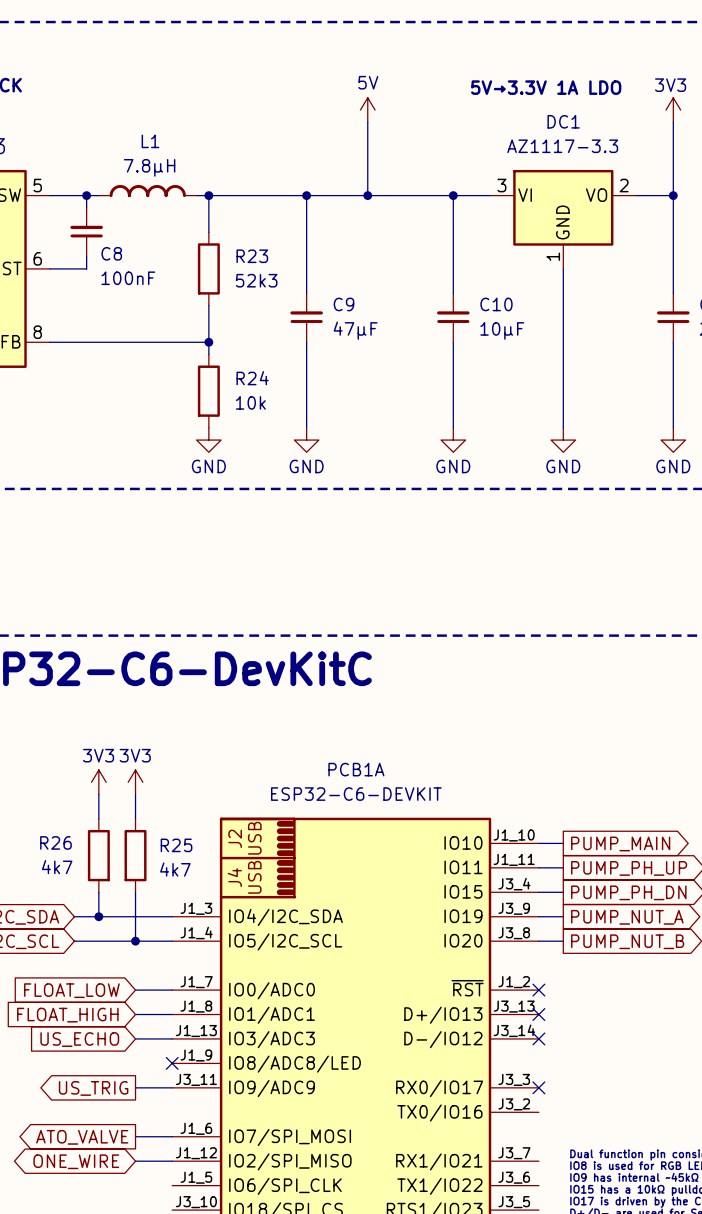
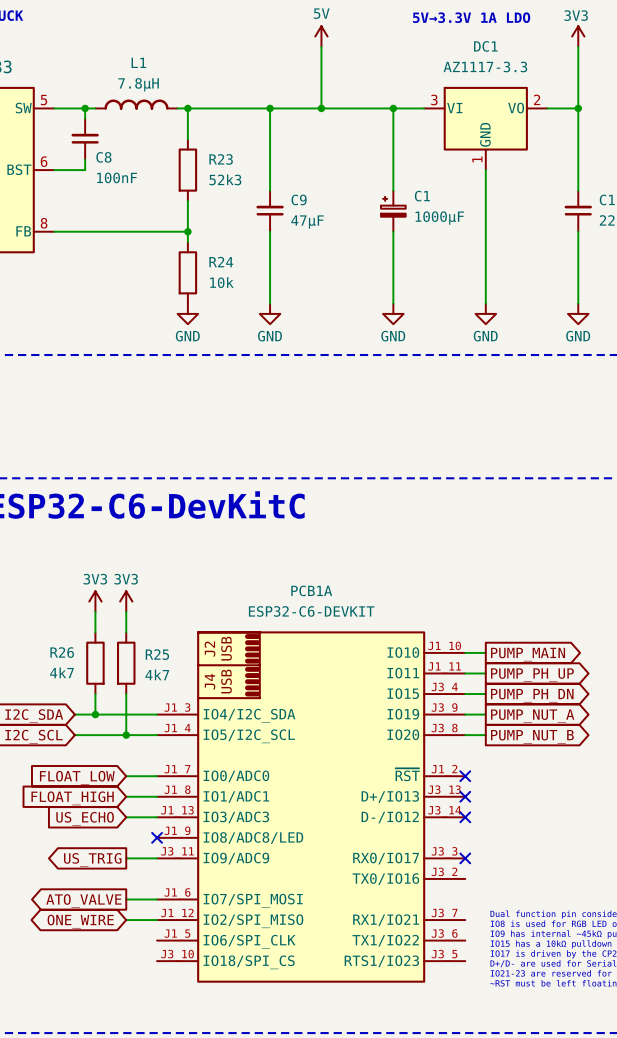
C10: 10μF (453, 317) -> none
C1: none -> 1000μF (393, 211)

